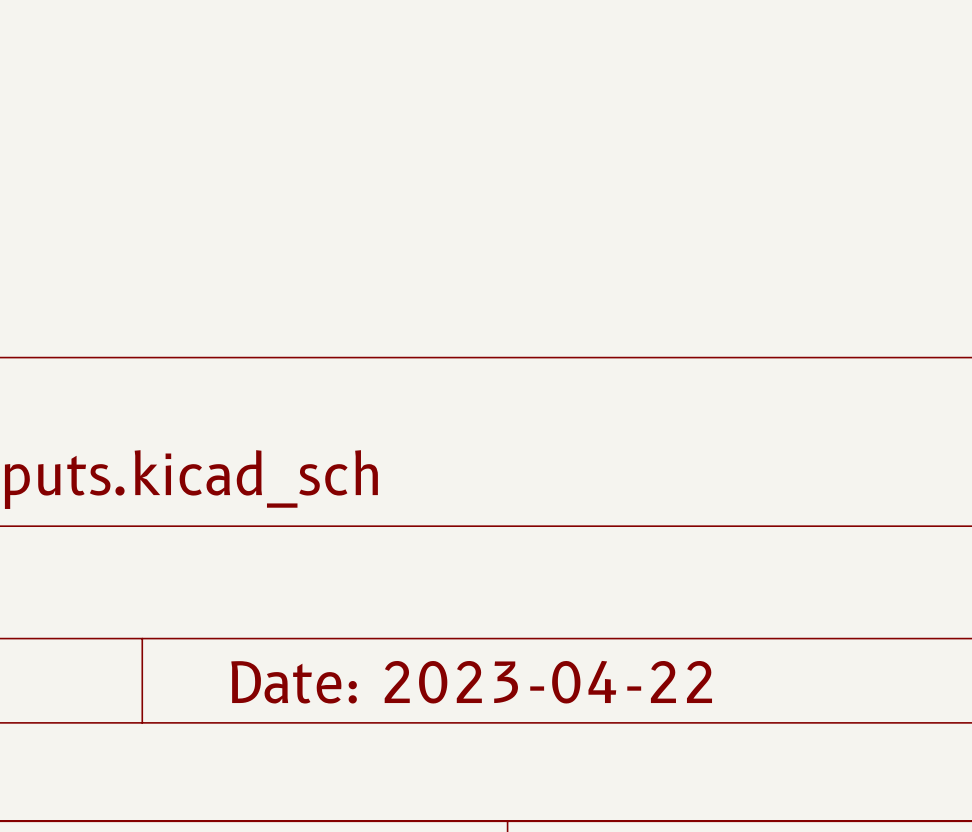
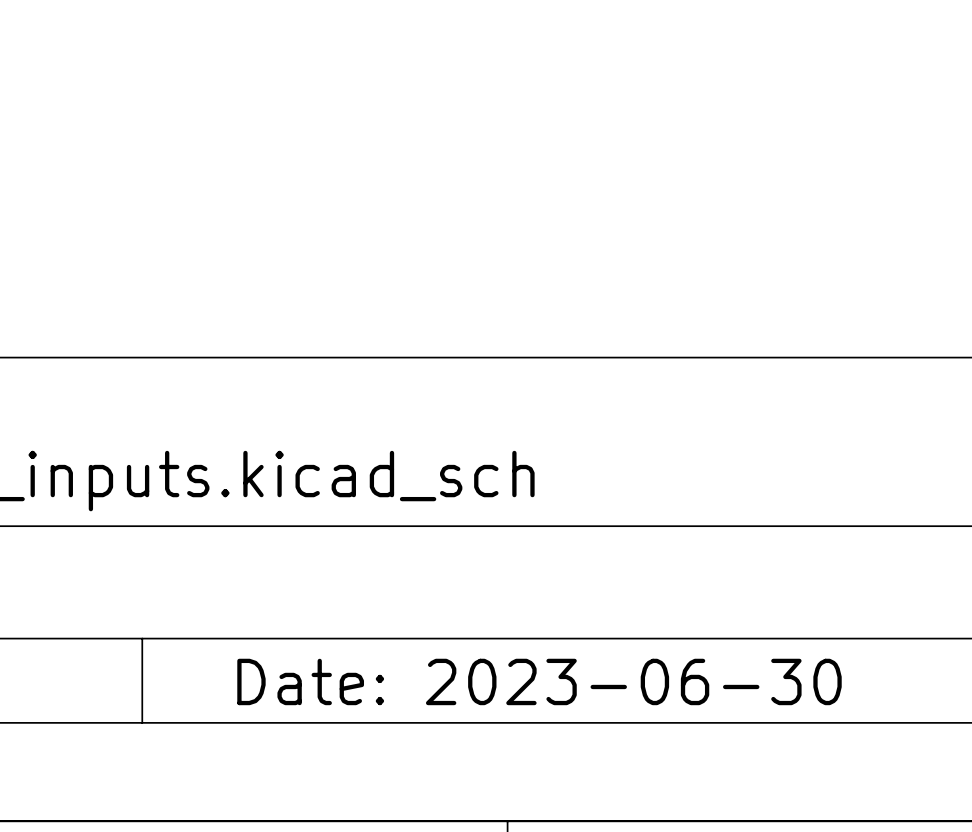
title block: Date: 2023-04-22 (471, 682) -> Date: 2023-06-30 (539, 681)

